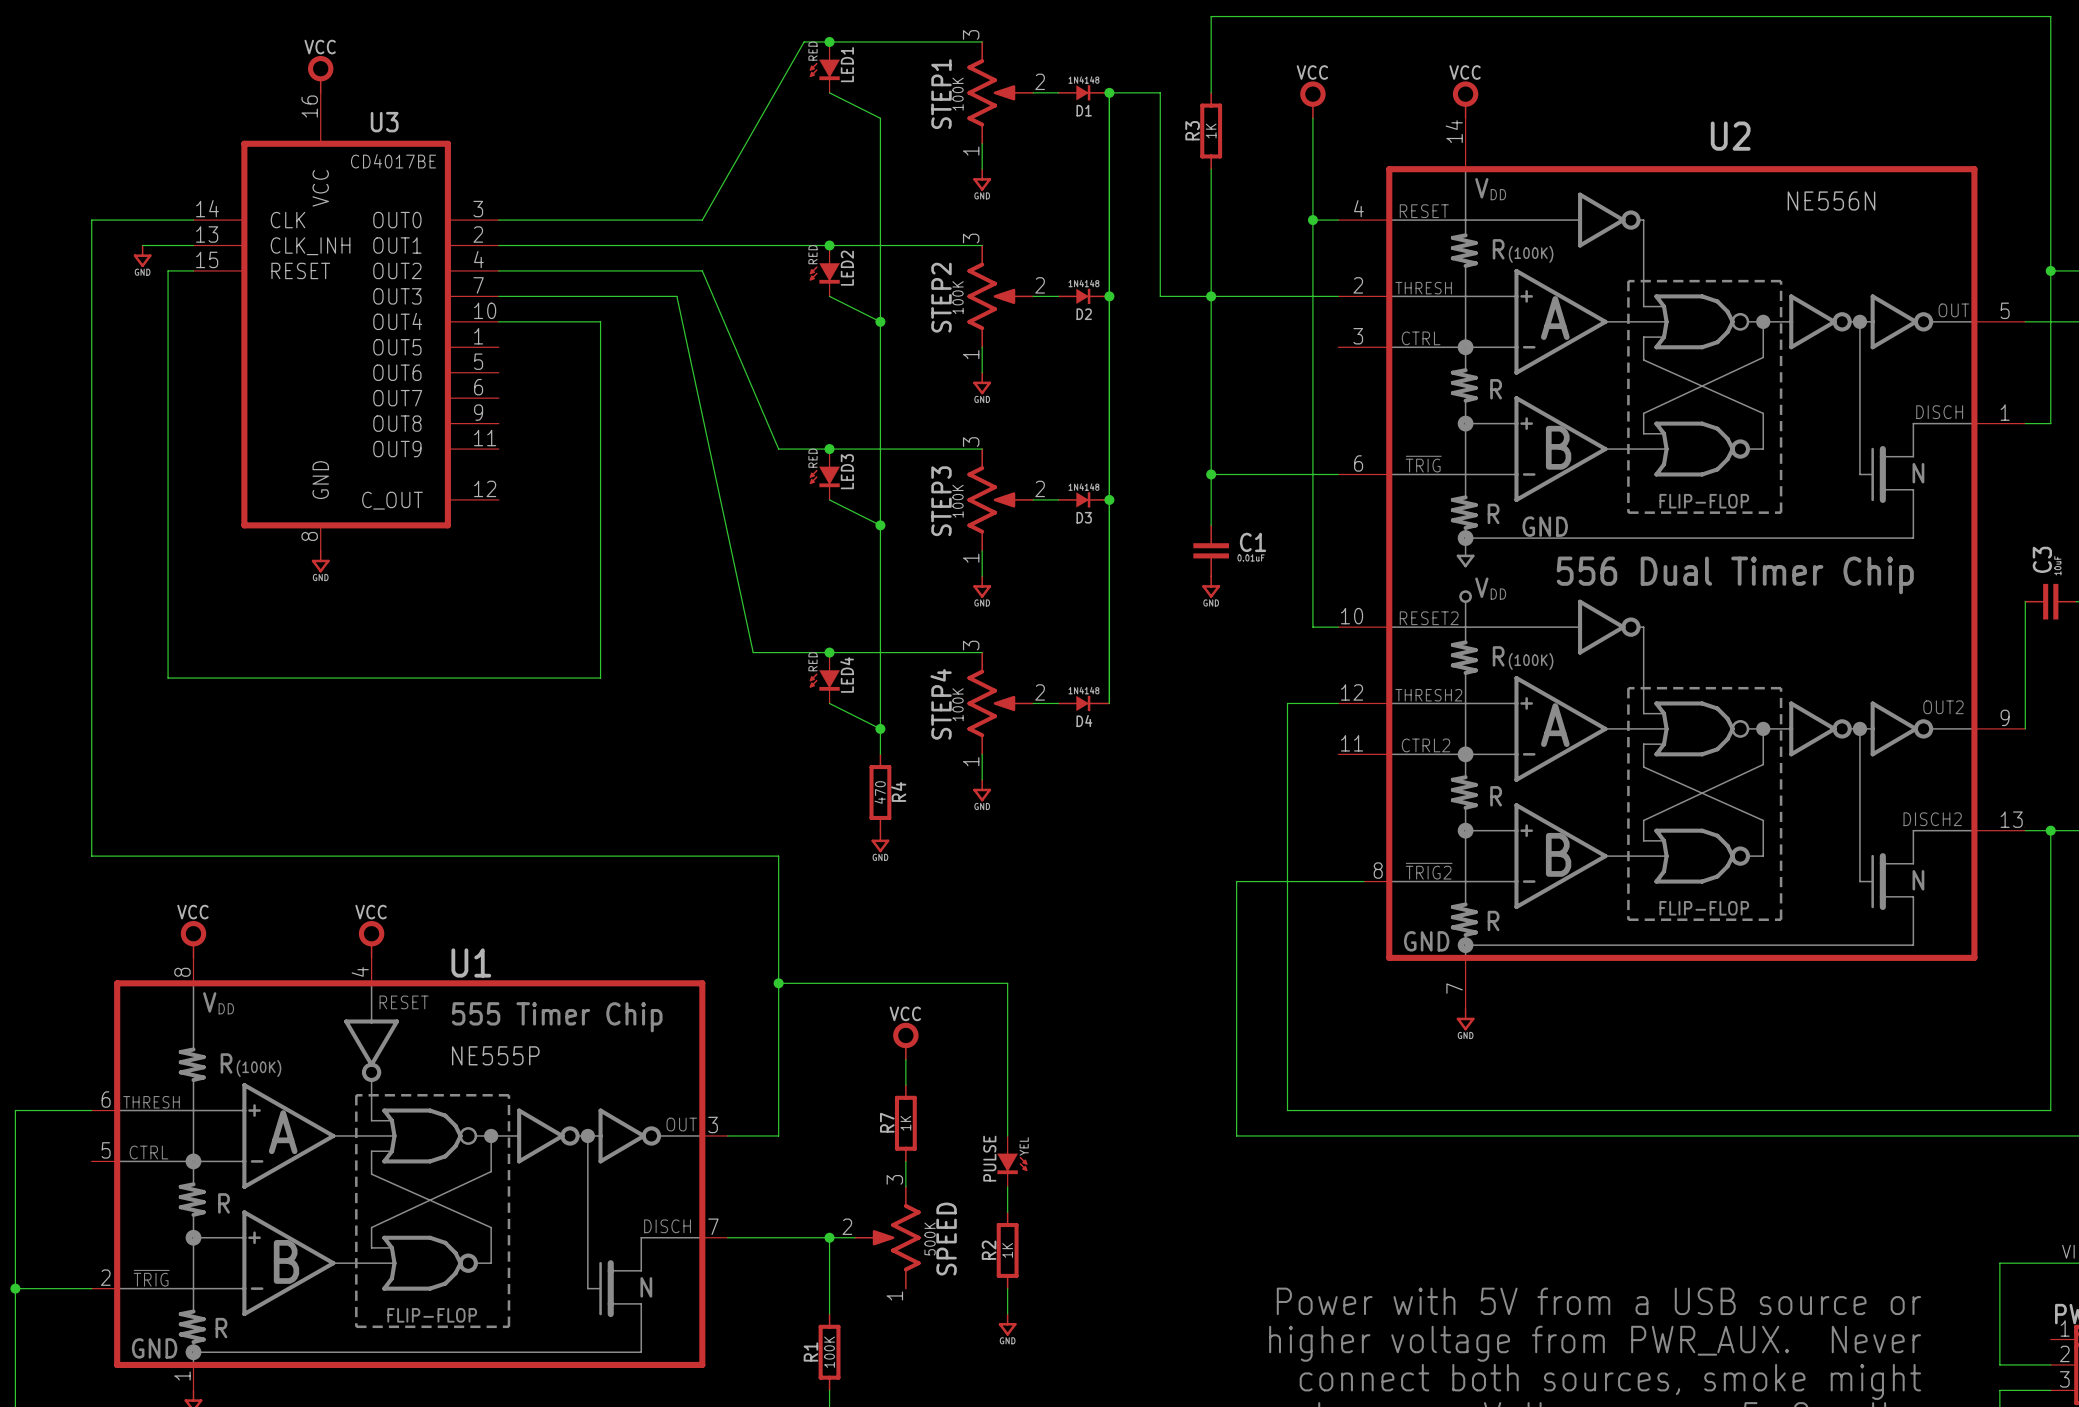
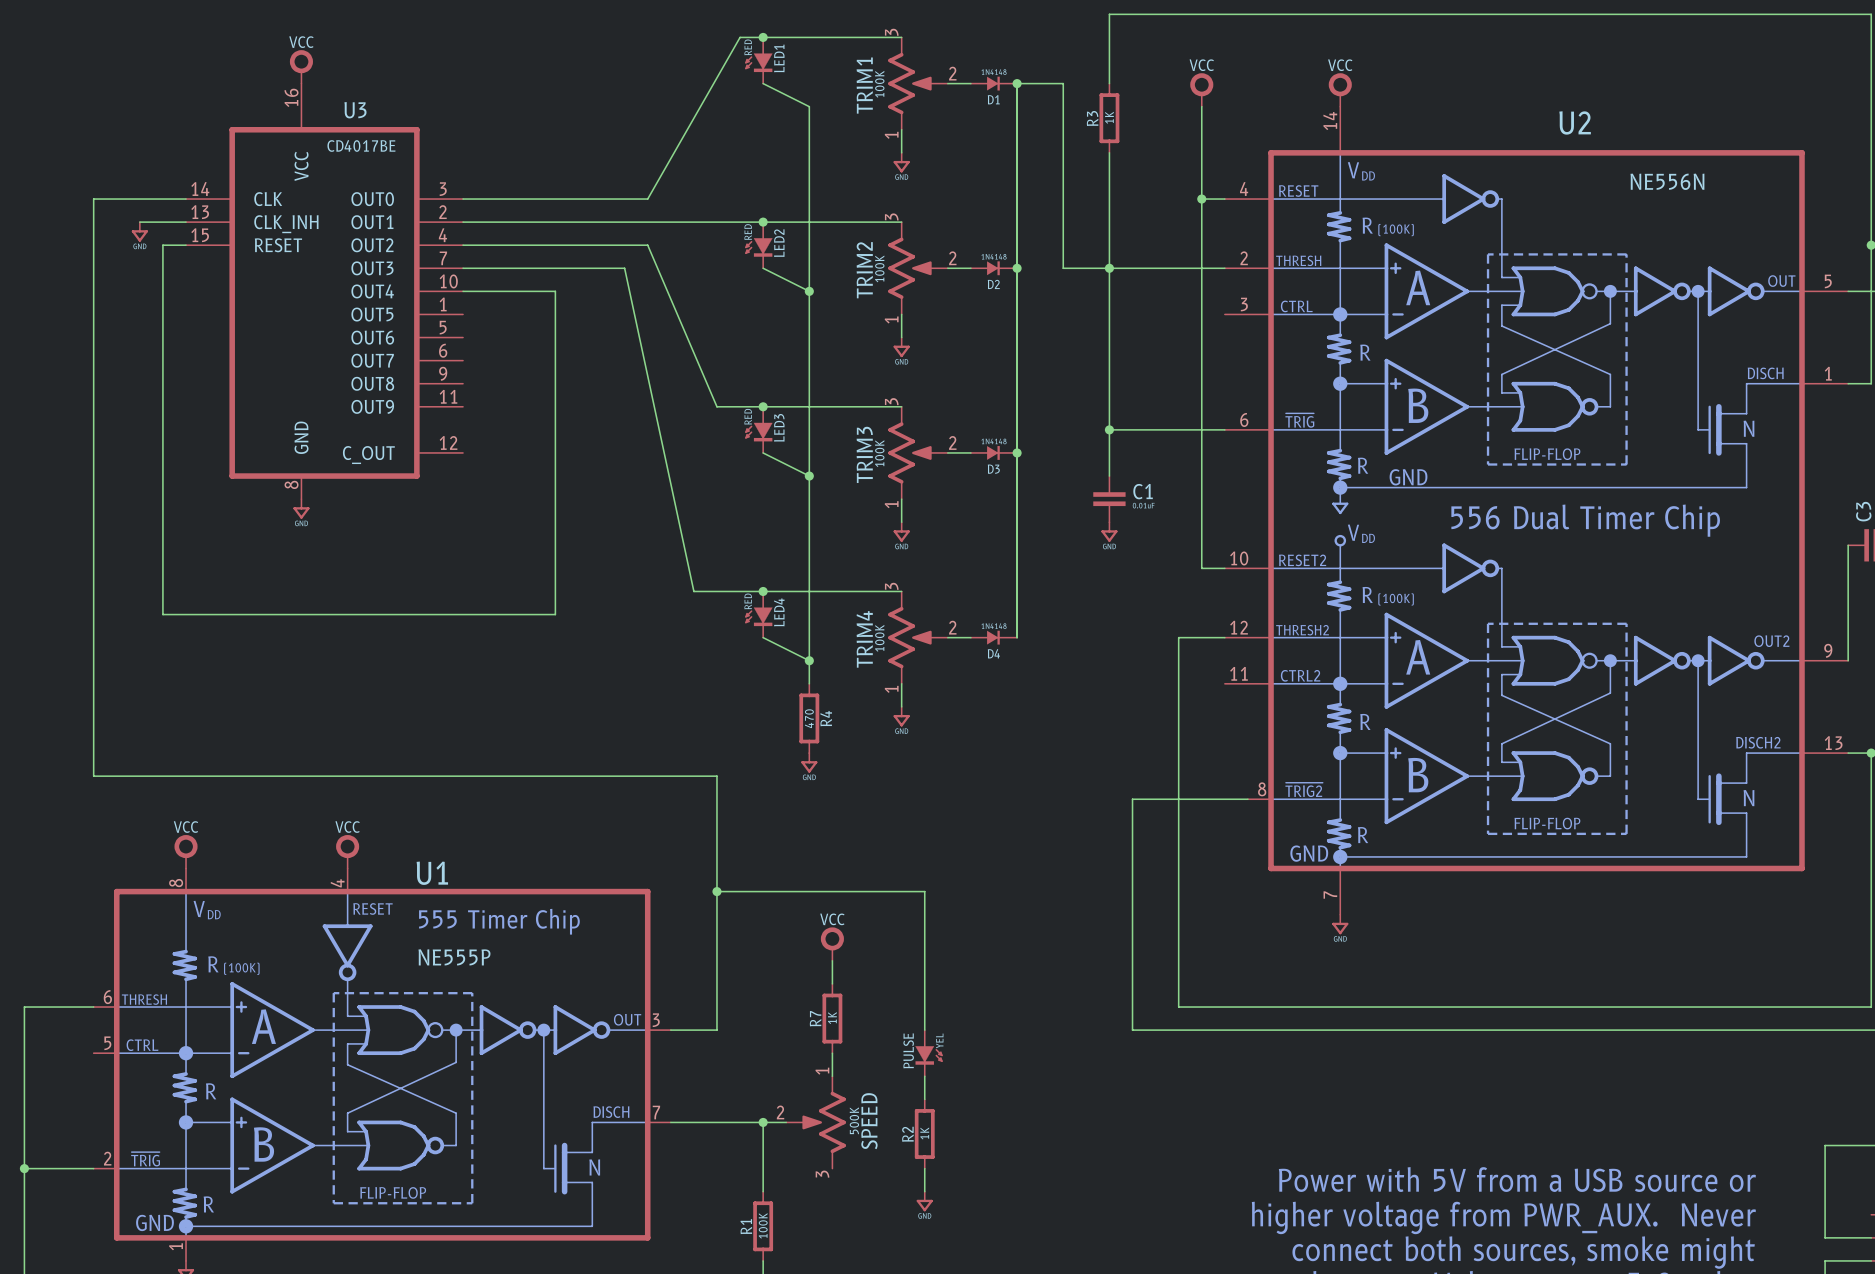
STEP1 name: STEP1 (941, 94) -> TRIM1 (864, 85)
STEP2 name: STEP2 (941, 297) -> TRIM2 (864, 270)
STEP3 name: STEP3 (941, 501) -> TRIM3 (864, 454)
STEP4 name: STEP4 (941, 704) -> TRIM4 (864, 639)
SPEED flip: as is (887, 1237) -> up-down (815, 1122)

